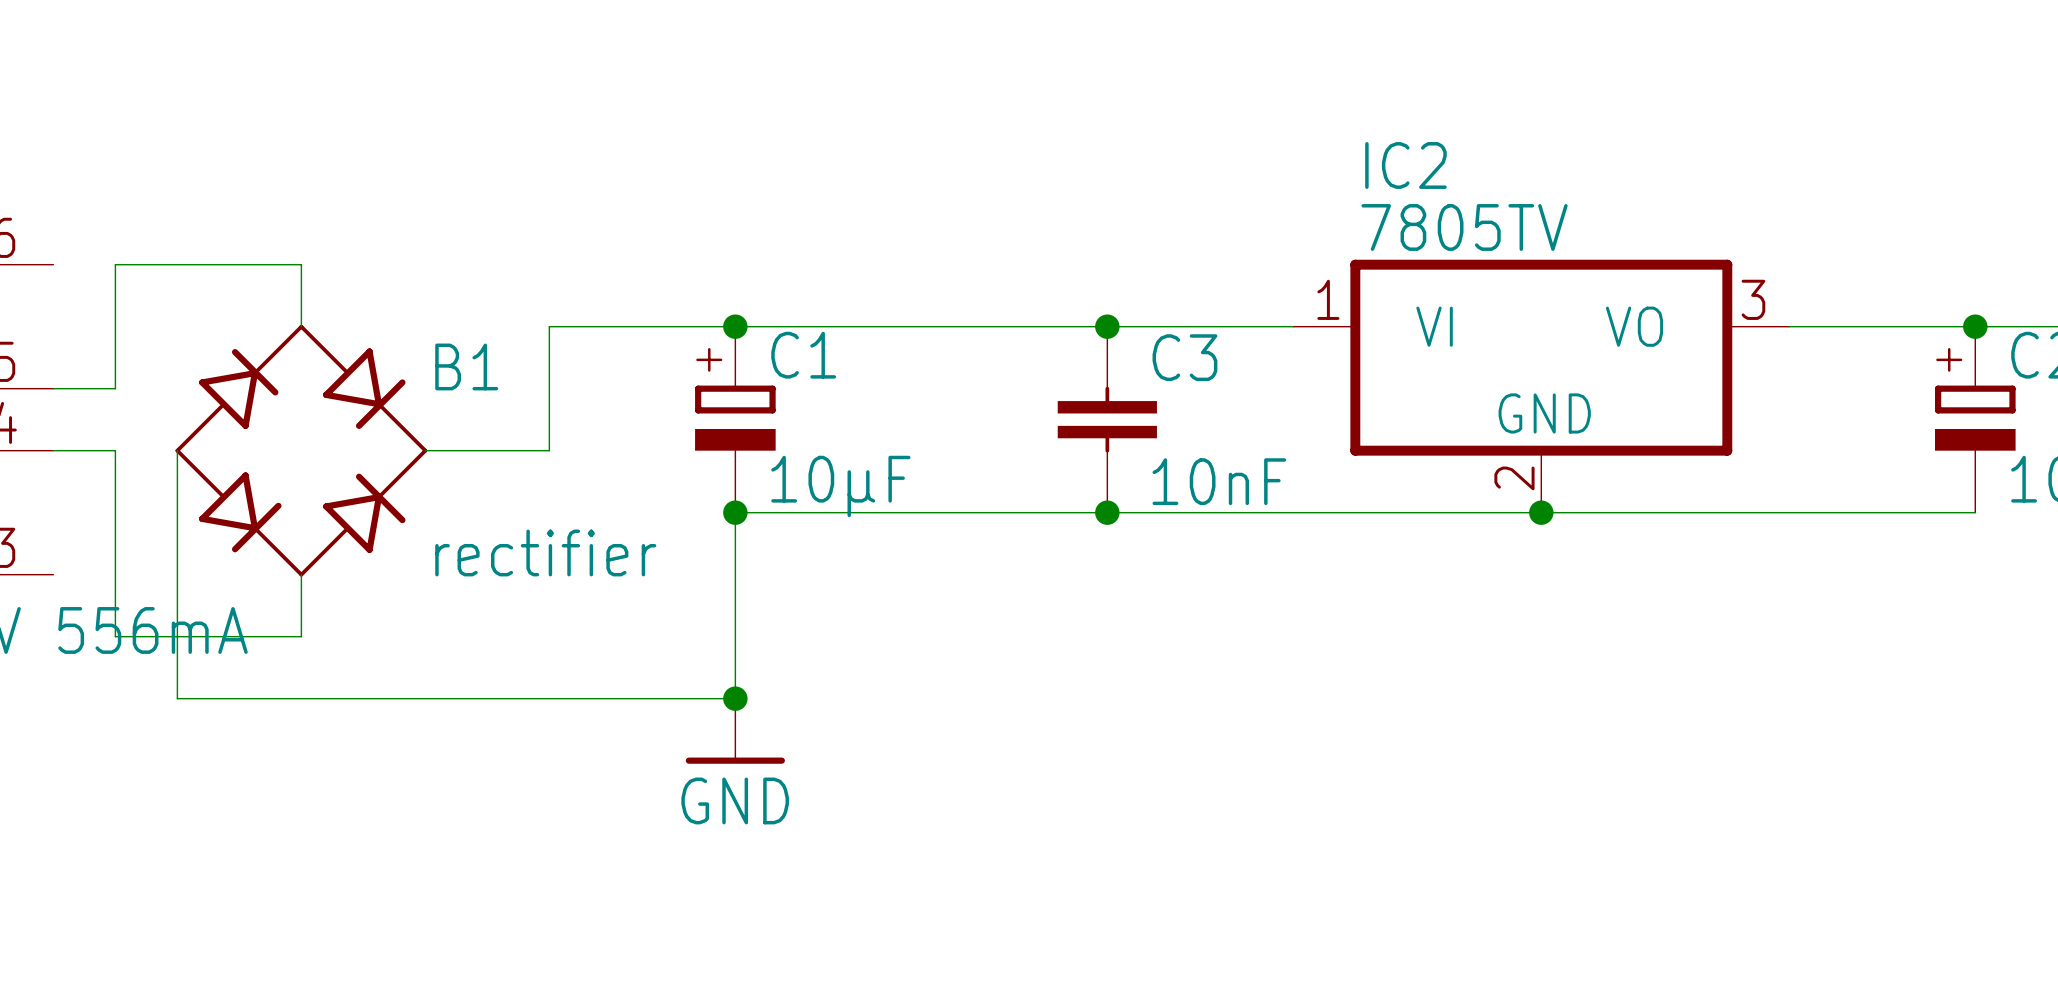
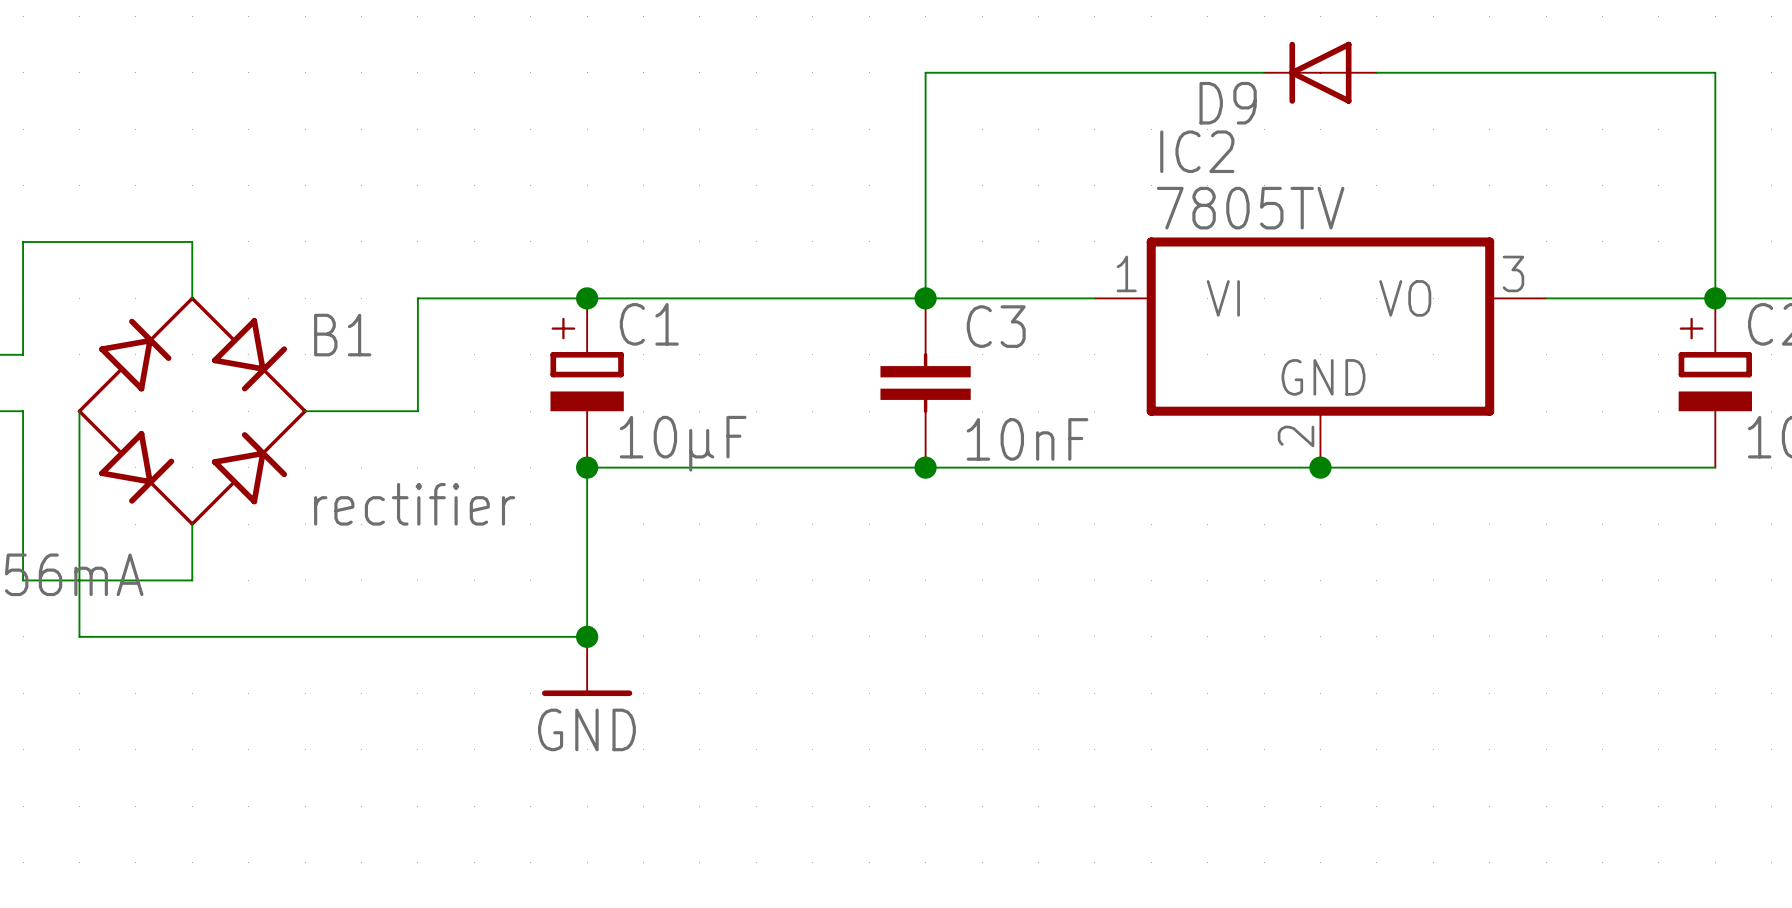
wire: none -> (1264, 72) (925, 72) (925, 298)
D9: none -> (1320, 72)
wire: none -> (1376, 72) (1715, 72) (1715, 298)

